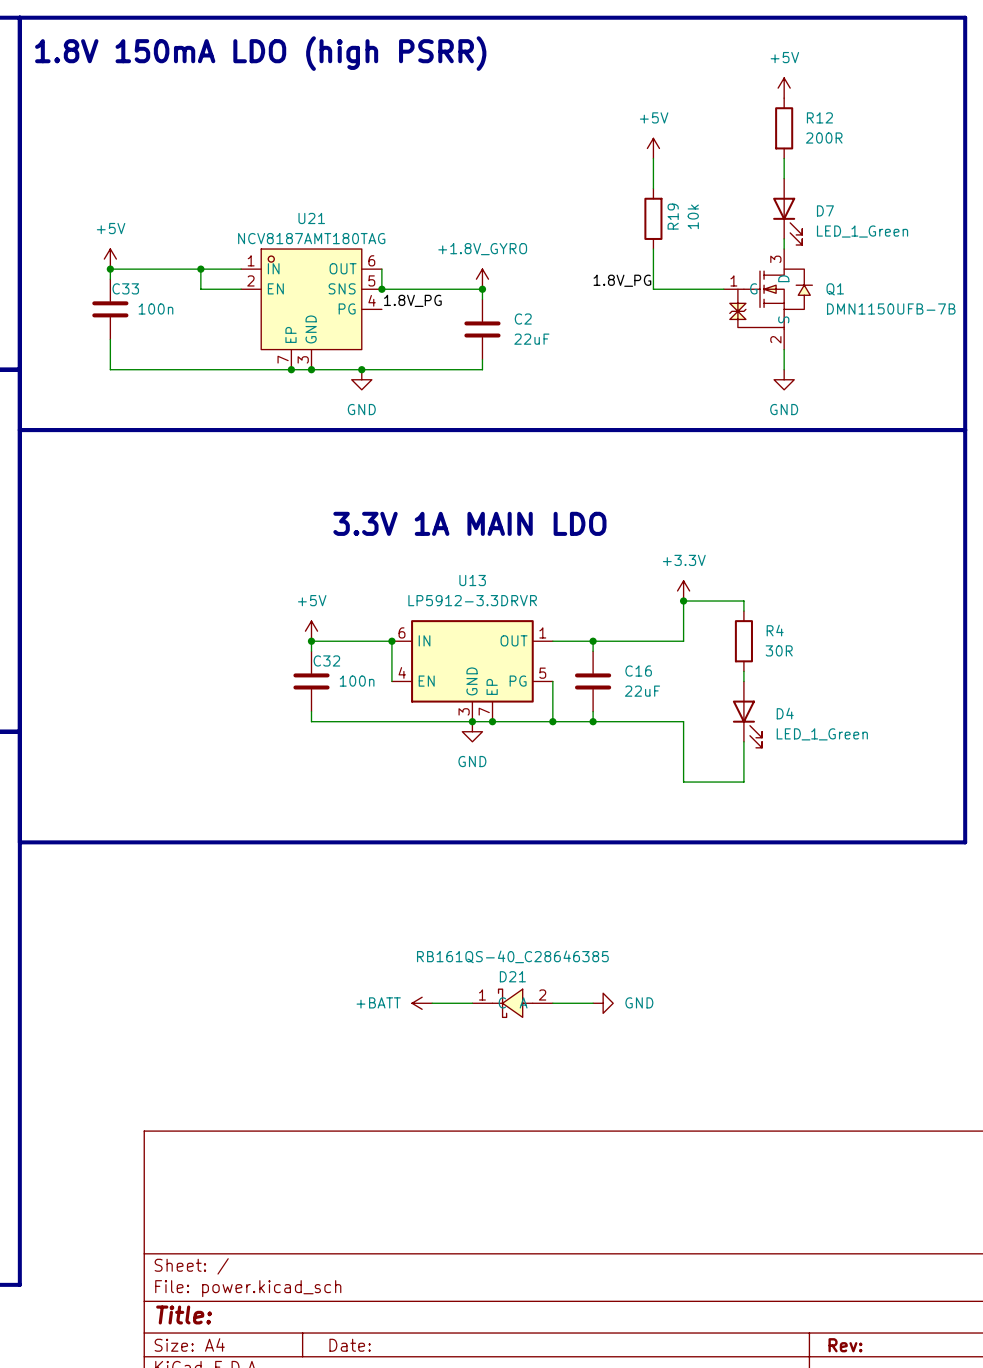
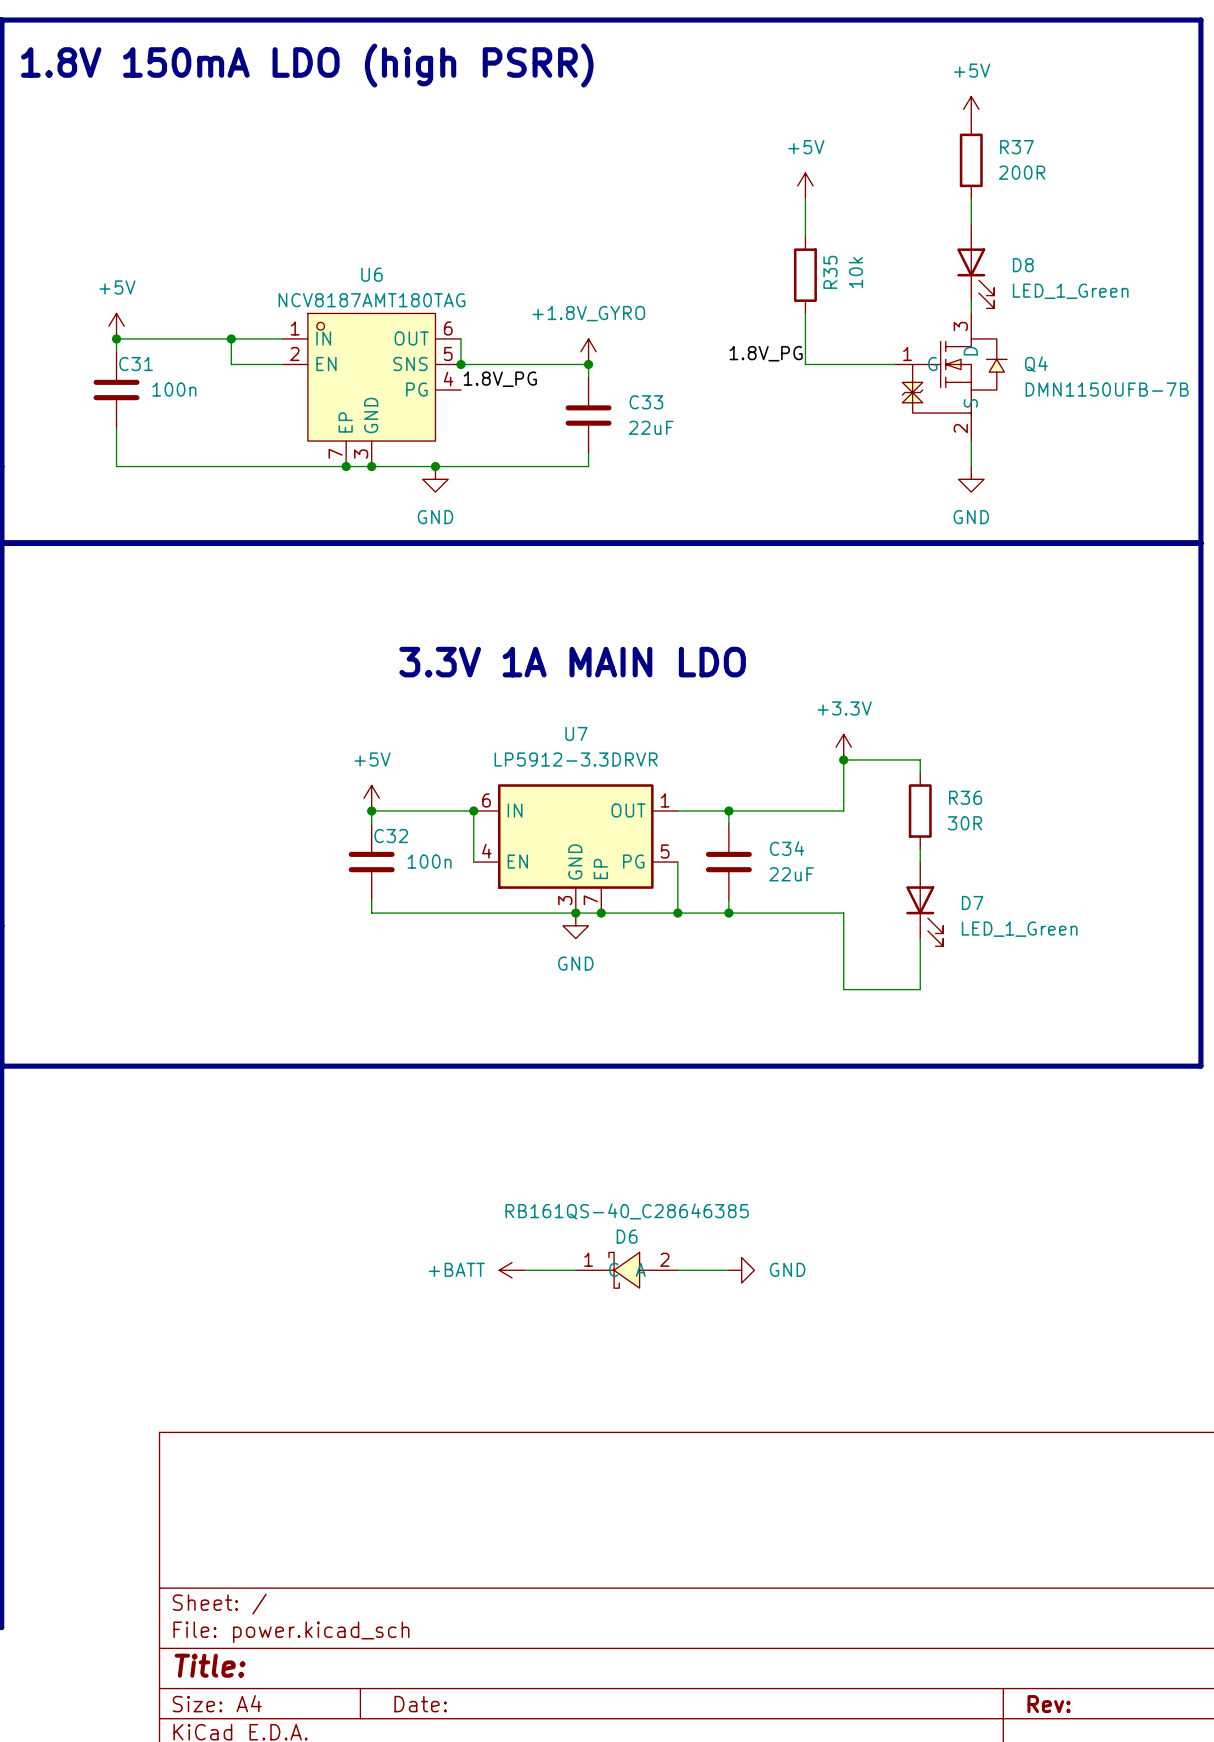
R12 name: R12 (819, 117) -> R37 (1016, 147)
D7 name: D7 (825, 210) -> D8 (1023, 265)
R19 name: R19 (673, 216) -> R35 (830, 272)
U21 name: U21 (311, 218) -> U6 (371, 274)
C33 name: C33 (125, 288) -> C31 (136, 364)
Q1 name: Q1 (835, 289) -> Q4 (1036, 364)
C2 name: C2 (523, 319) -> C33 (646, 402)
U13 name: U13 (472, 580) -> U7 (576, 733)
R4 name: R4 (775, 630) -> R36 (965, 797)
C16 name: C16 (638, 671) -> C34 (787, 848)
D4 name: D4 (785, 713) -> D7 (972, 903)
D21 name: D21 (512, 976) -> D6 (627, 1236)

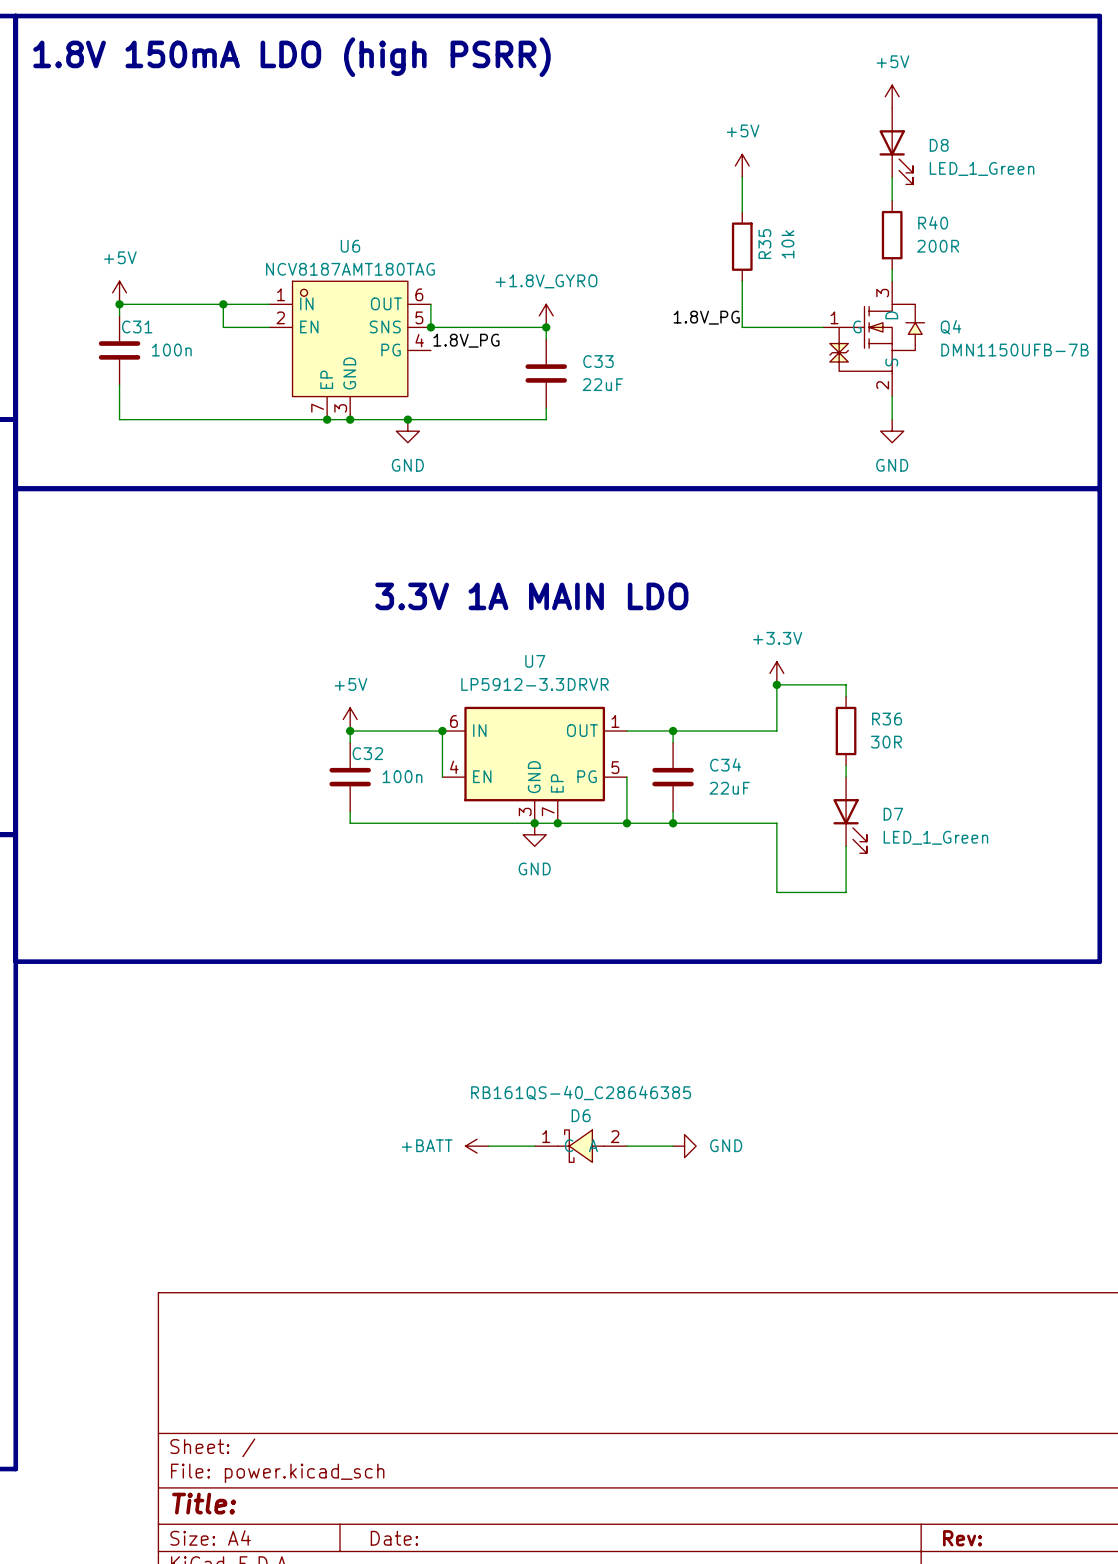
R37: 200R (971, 160) -> none
R40: none -> 200R (892, 235)
D8 position: (975, 266) -> (896, 146)

